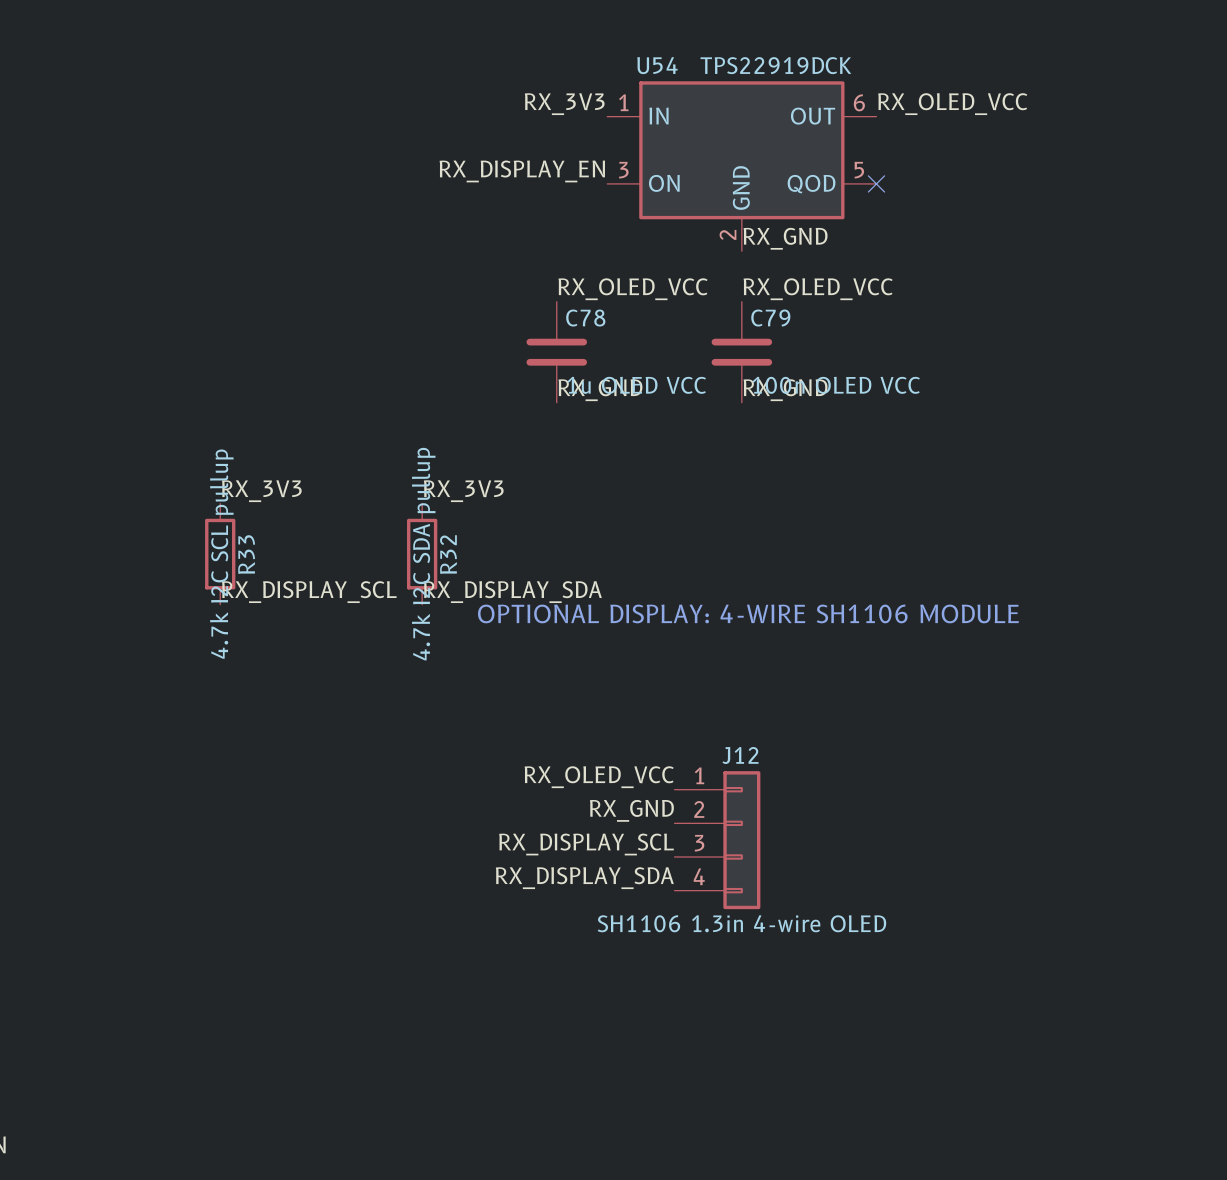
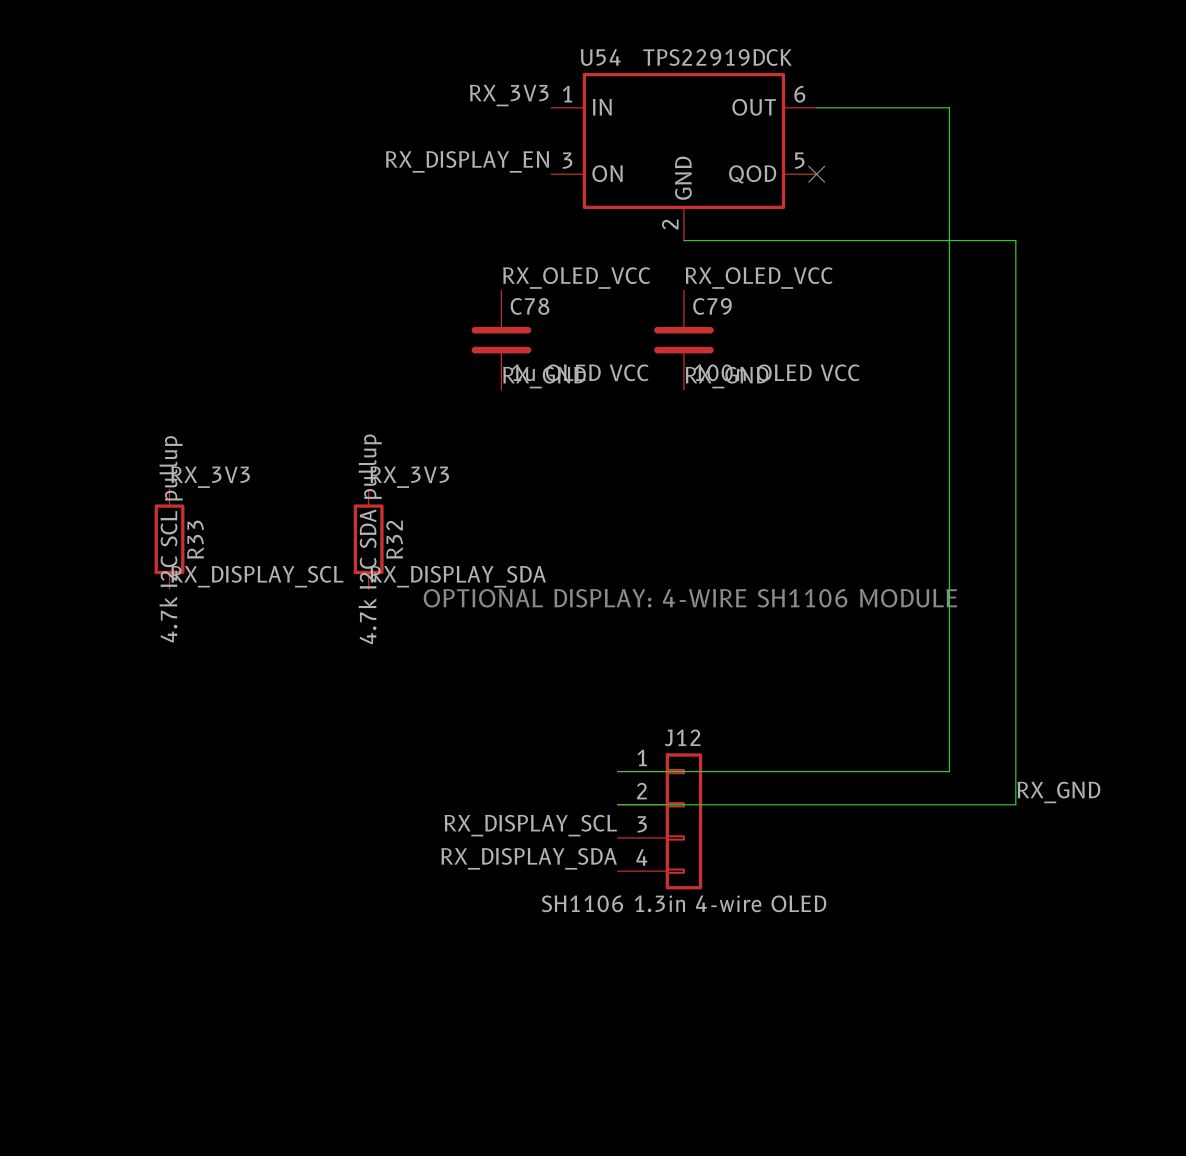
label: RX_OLED_VCC (952, 104) -> none
wire: none -> (816, 107) (949, 107) (949, 771) (617, 771)
label: RX_GND (785, 238) -> none
wire: none -> (683, 240) (1015, 240) (1015, 804) (617, 804)
label: RX_OLED_VCC (599, 777) -> none
label: RX_GND (631, 810) -> none
label: none -> RX_GND (1058, 792)

